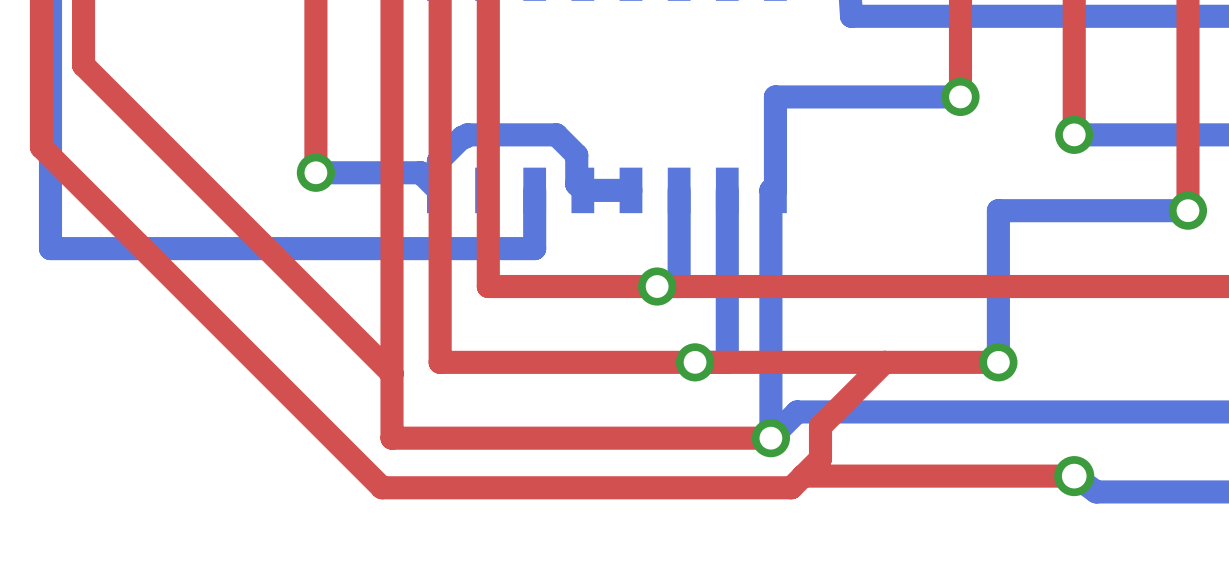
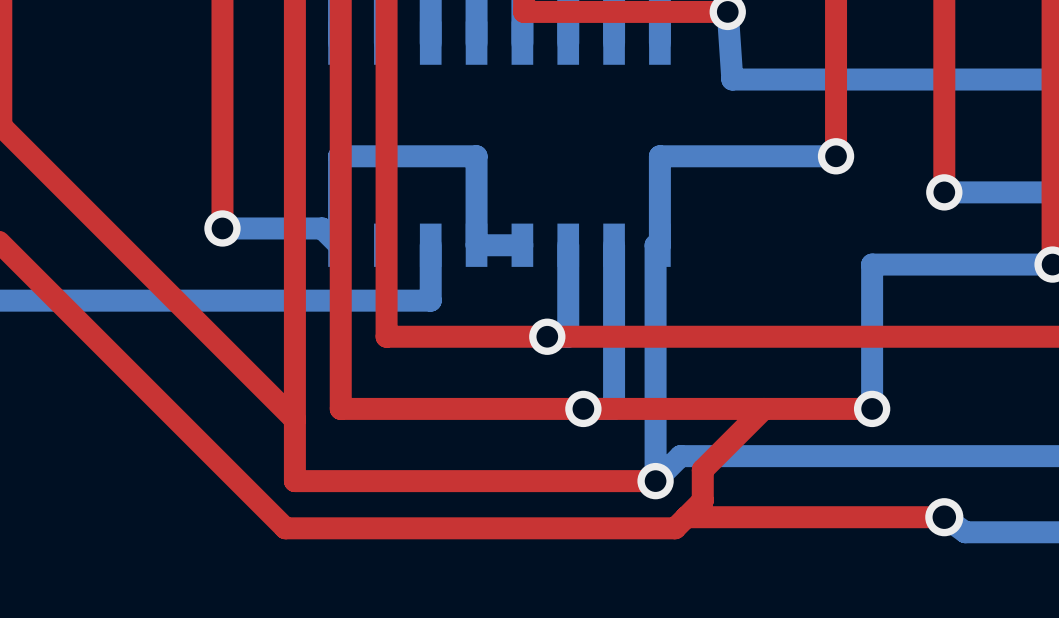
bottom track: (438, 161) (462, 137) (467, 134) (556, 134) (576, 155) (576, 184) (582, 190) -> (339, 217) (339, 156) (476, 156) (476, 245)

